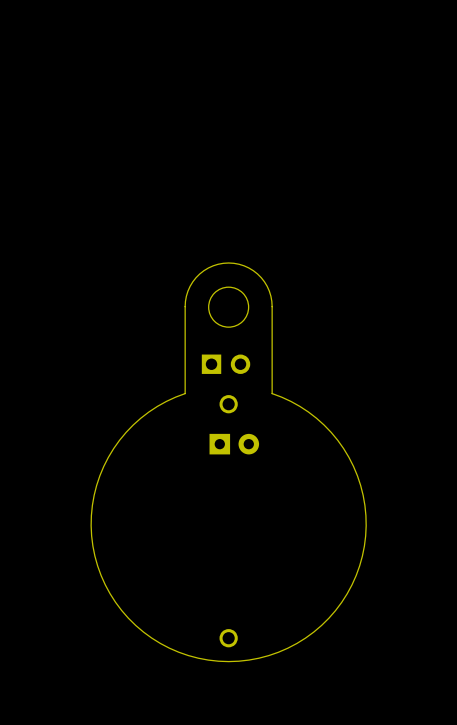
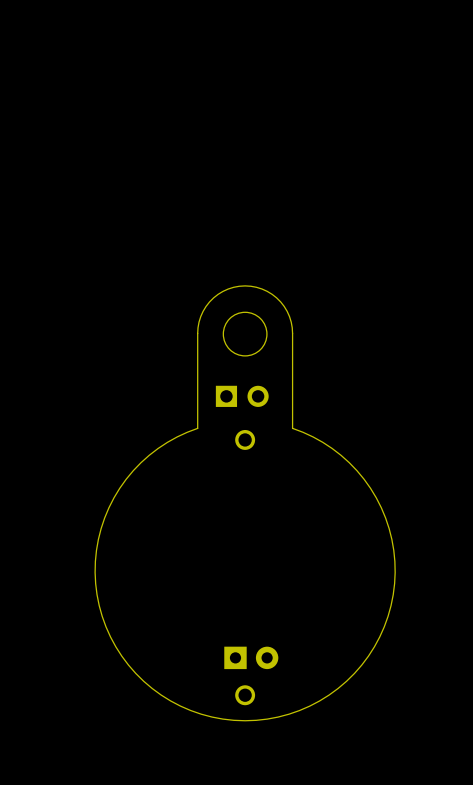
part position: (234, 444) -> (251, 657)

